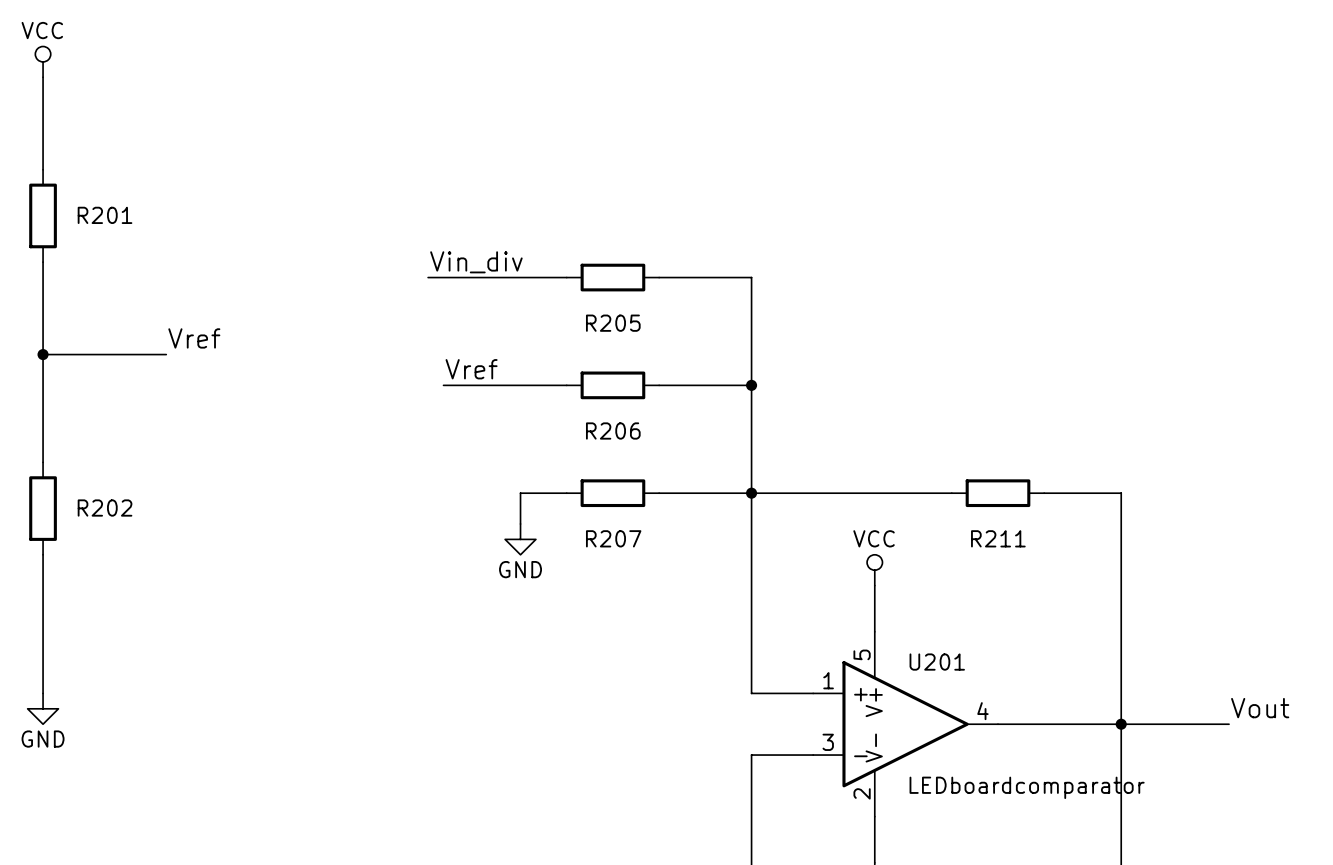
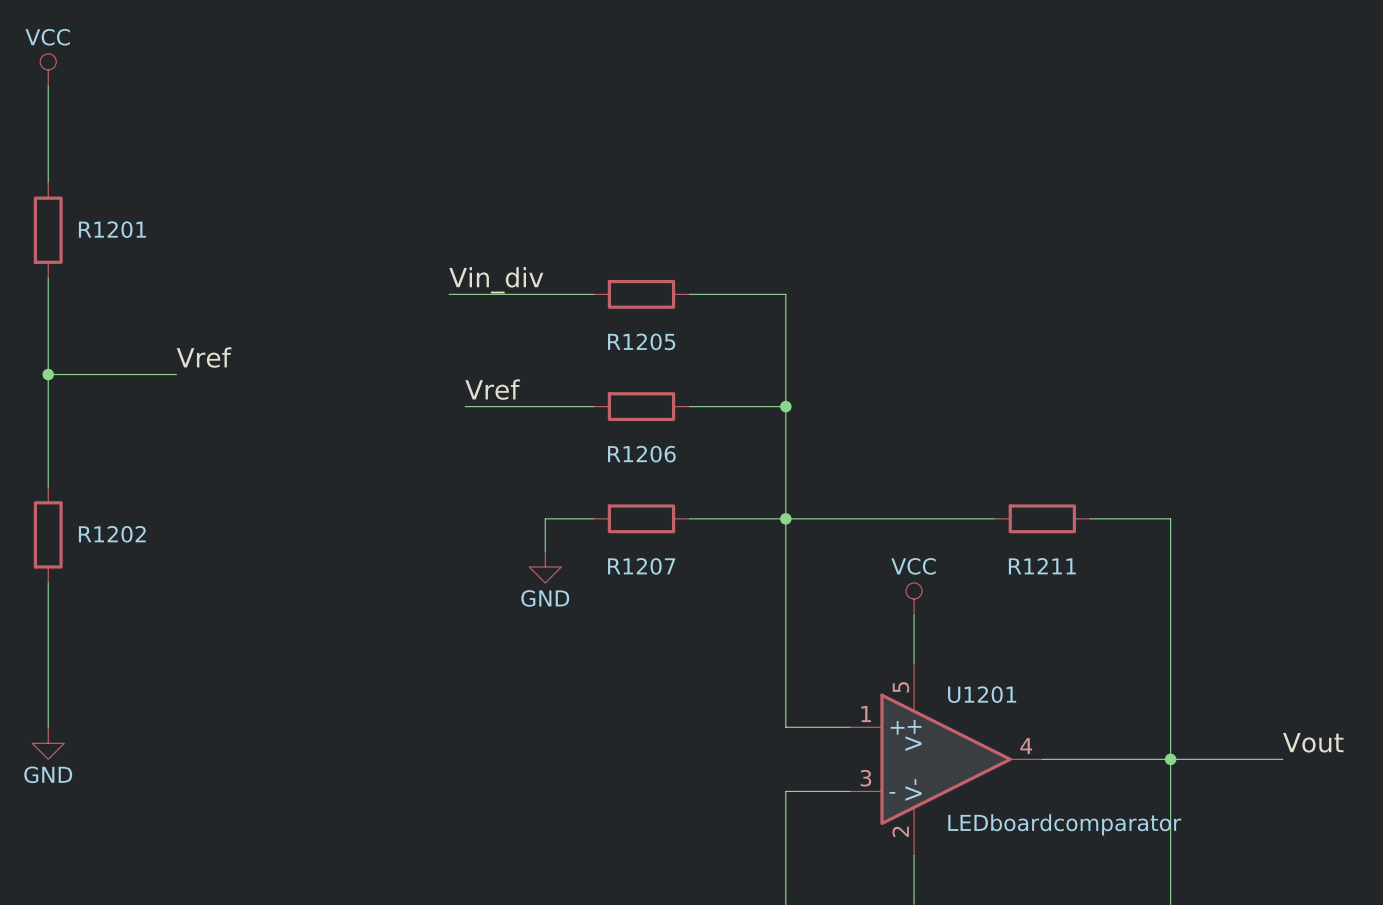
R201 name: R201 (105, 215) -> R1201 (112, 229)
R205 name: R205 (613, 323) -> R1205 (641, 341)
R206 name: R206 (613, 431) -> R1206 (641, 454)
R202 name: R202 (105, 508) -> R1202 (112, 534)
R207 name: R207 (613, 538) -> R1207 (641, 566)
R211 name: R211 (998, 538) -> R1211 (1042, 566)
U201 name: U201 (937, 662) -> U1201 (982, 694)

